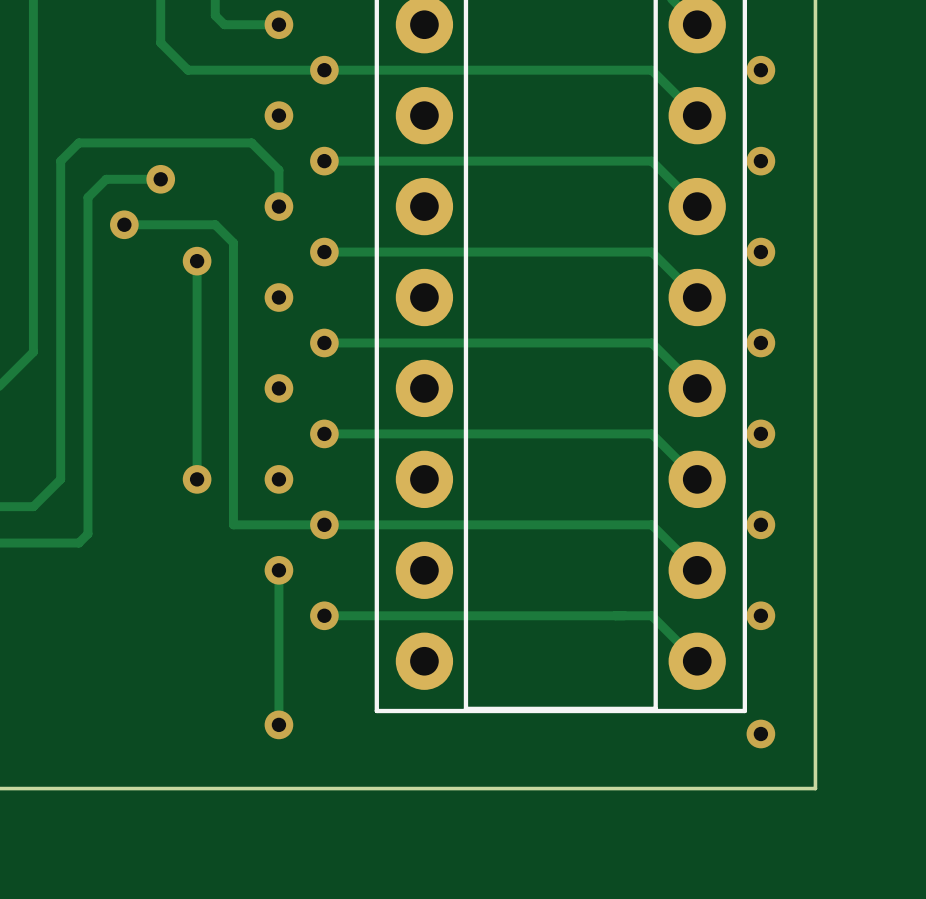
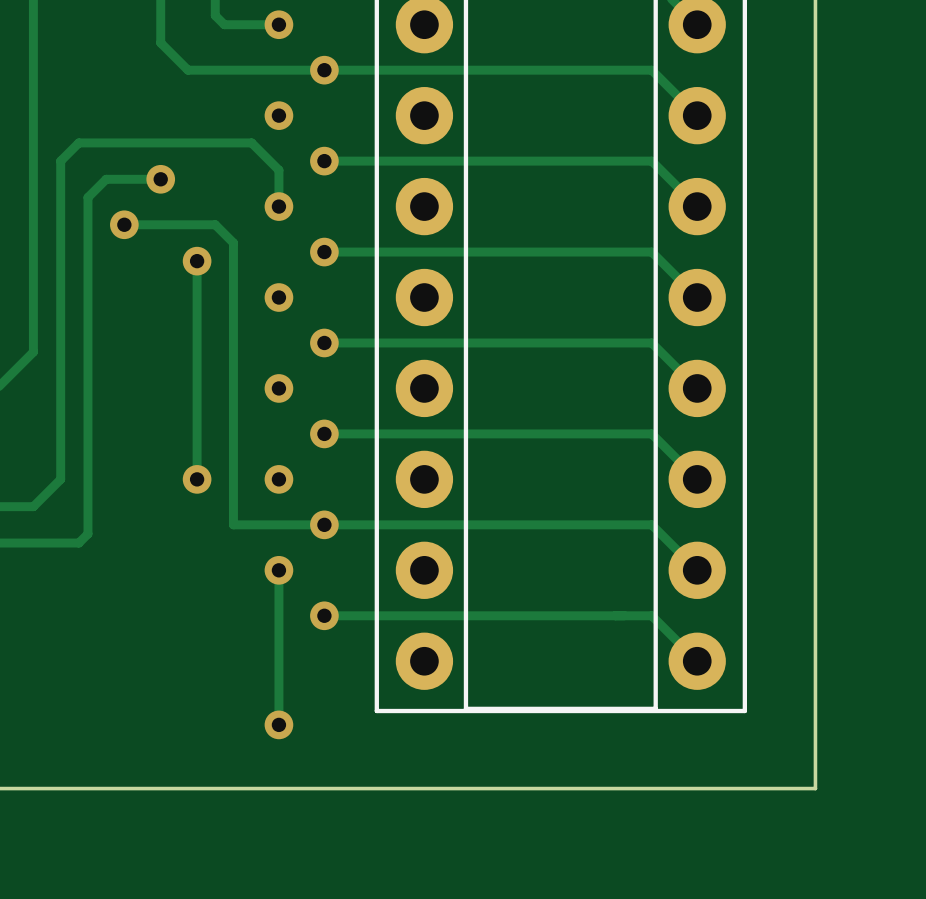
via: (760, 70) -> none
via: (760, 161) -> none
via: (760, 252) -> none
via: (760, 342) -> none
via: (760, 433) -> none
via: (760, 524) -> none
via: (760, 615) -> none
via: (760, 734) -> none

